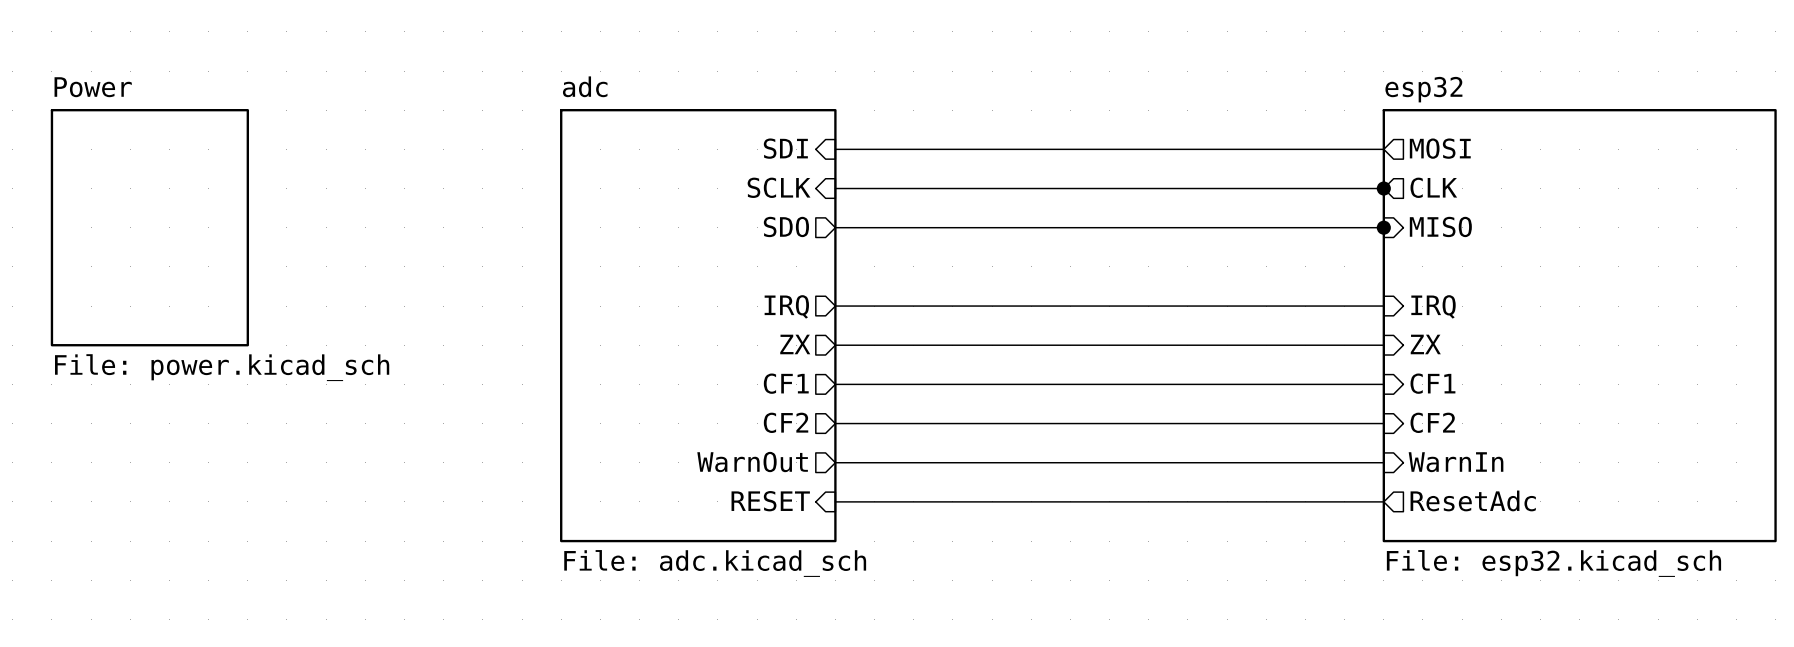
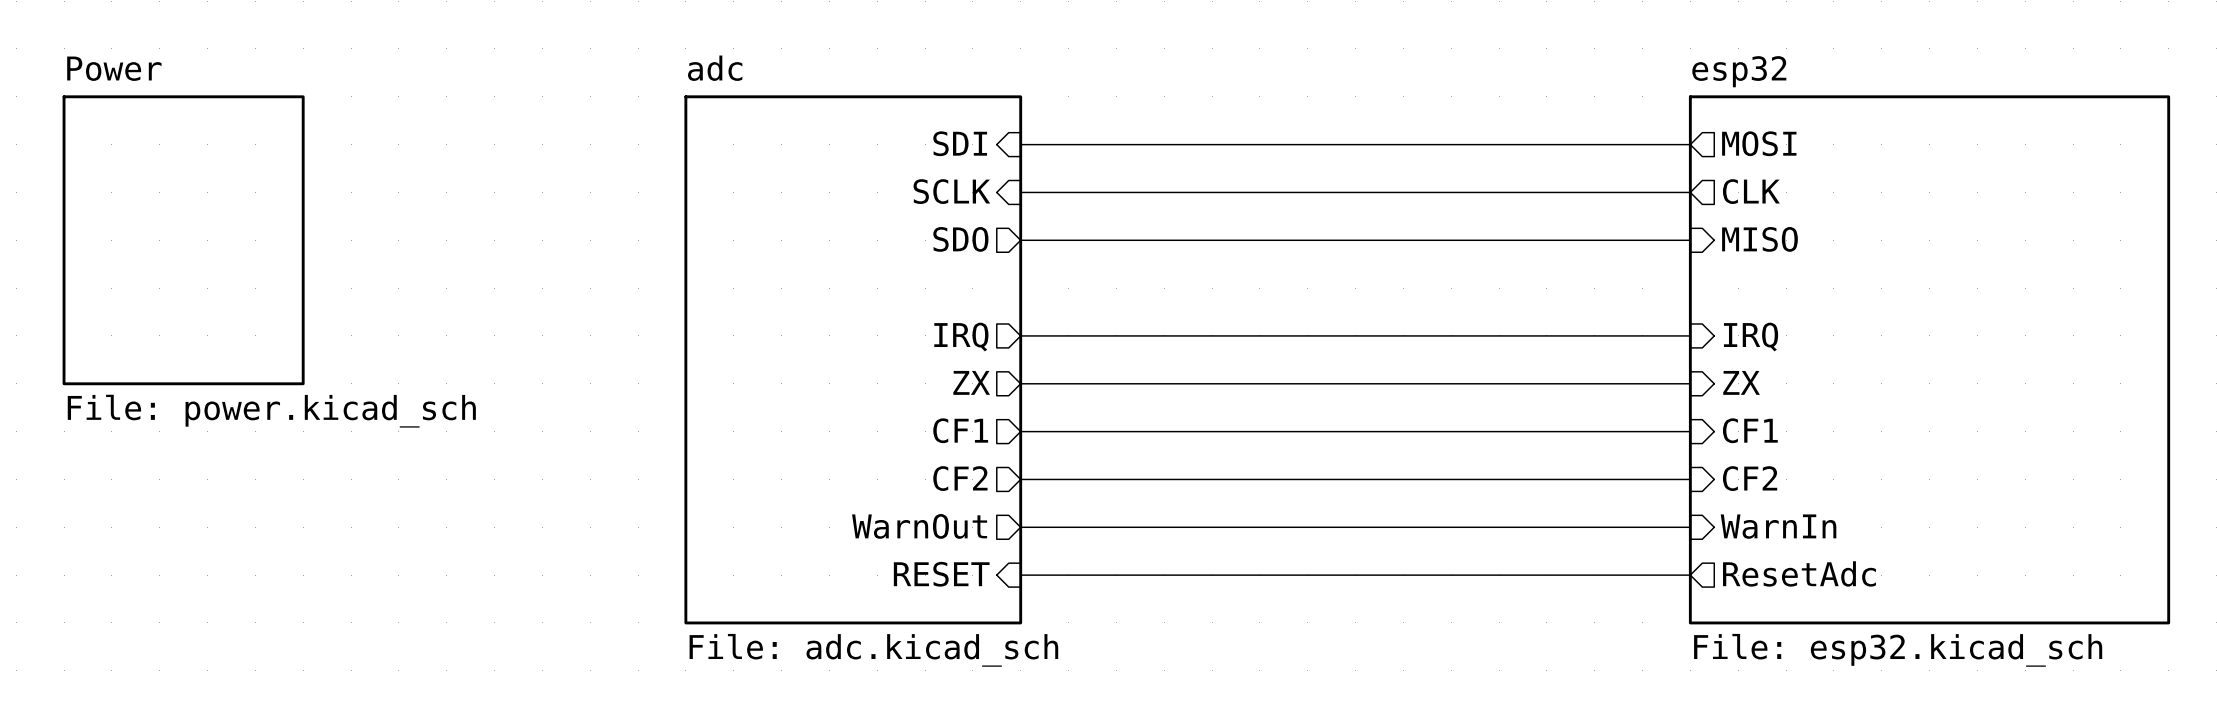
junction: (1383, 188) -> none
junction: (1383, 227) -> none

